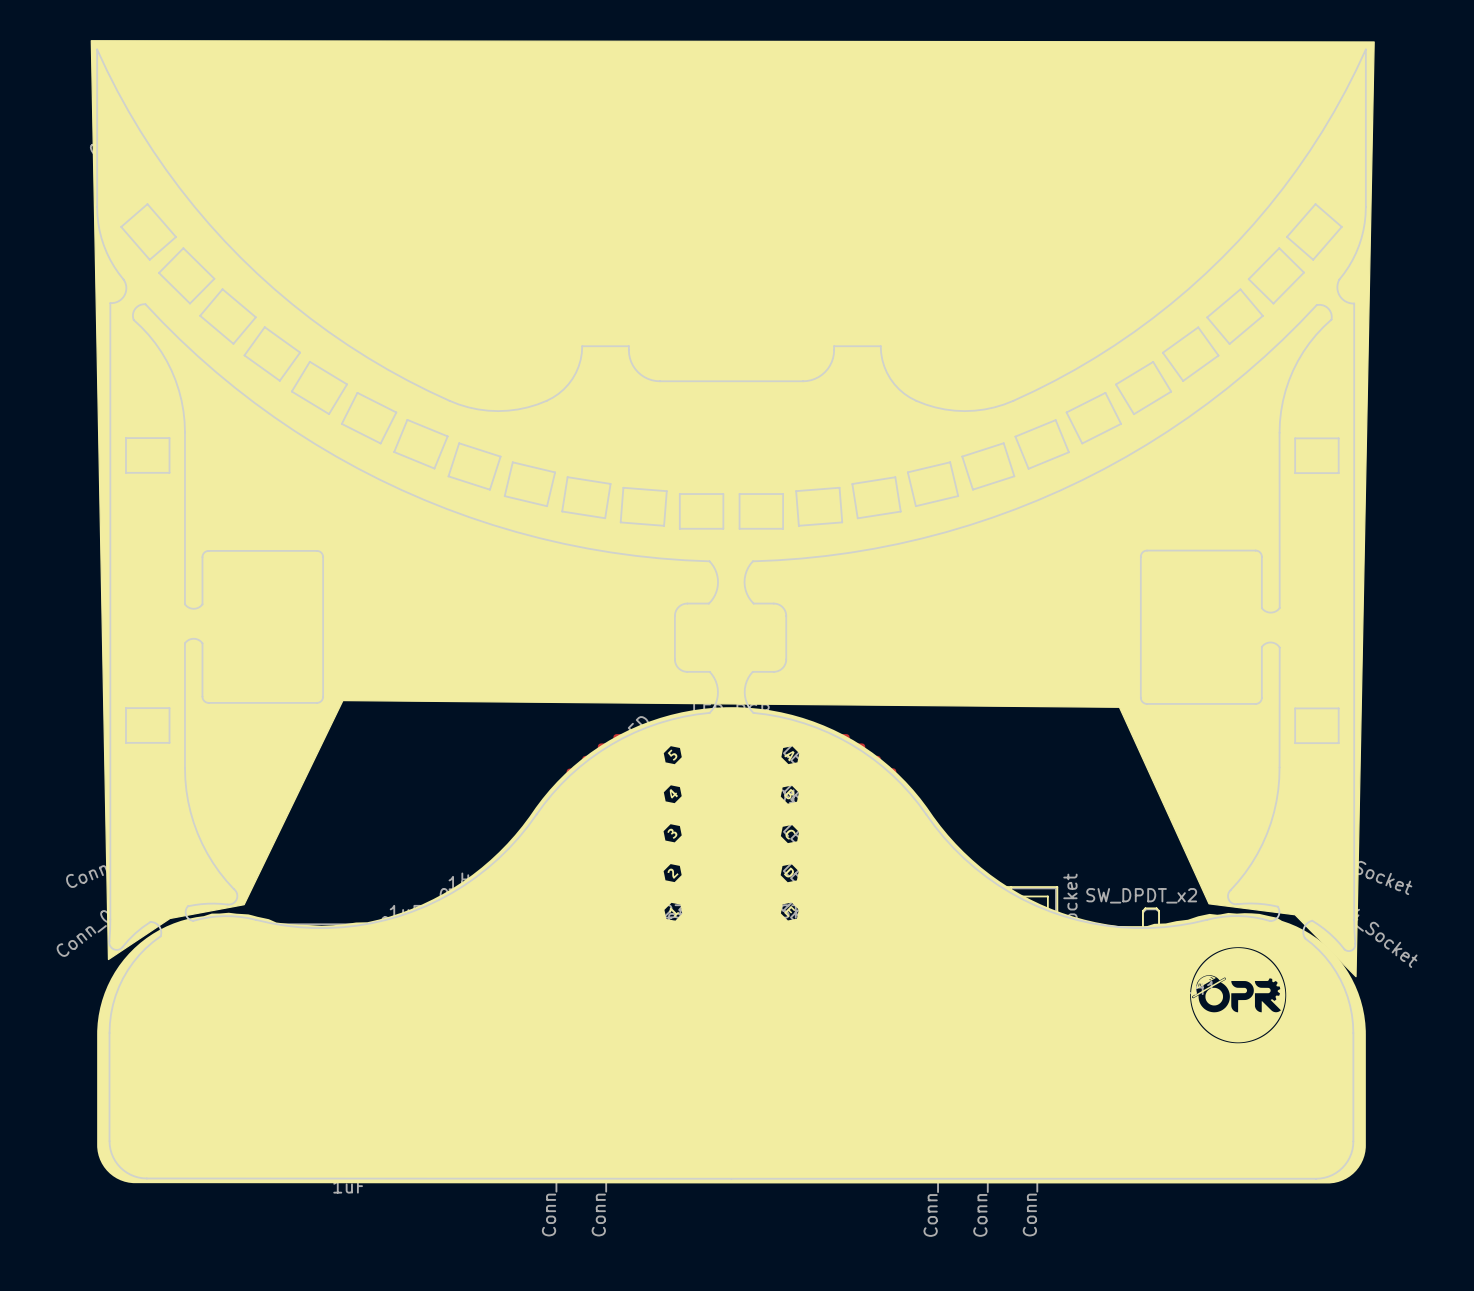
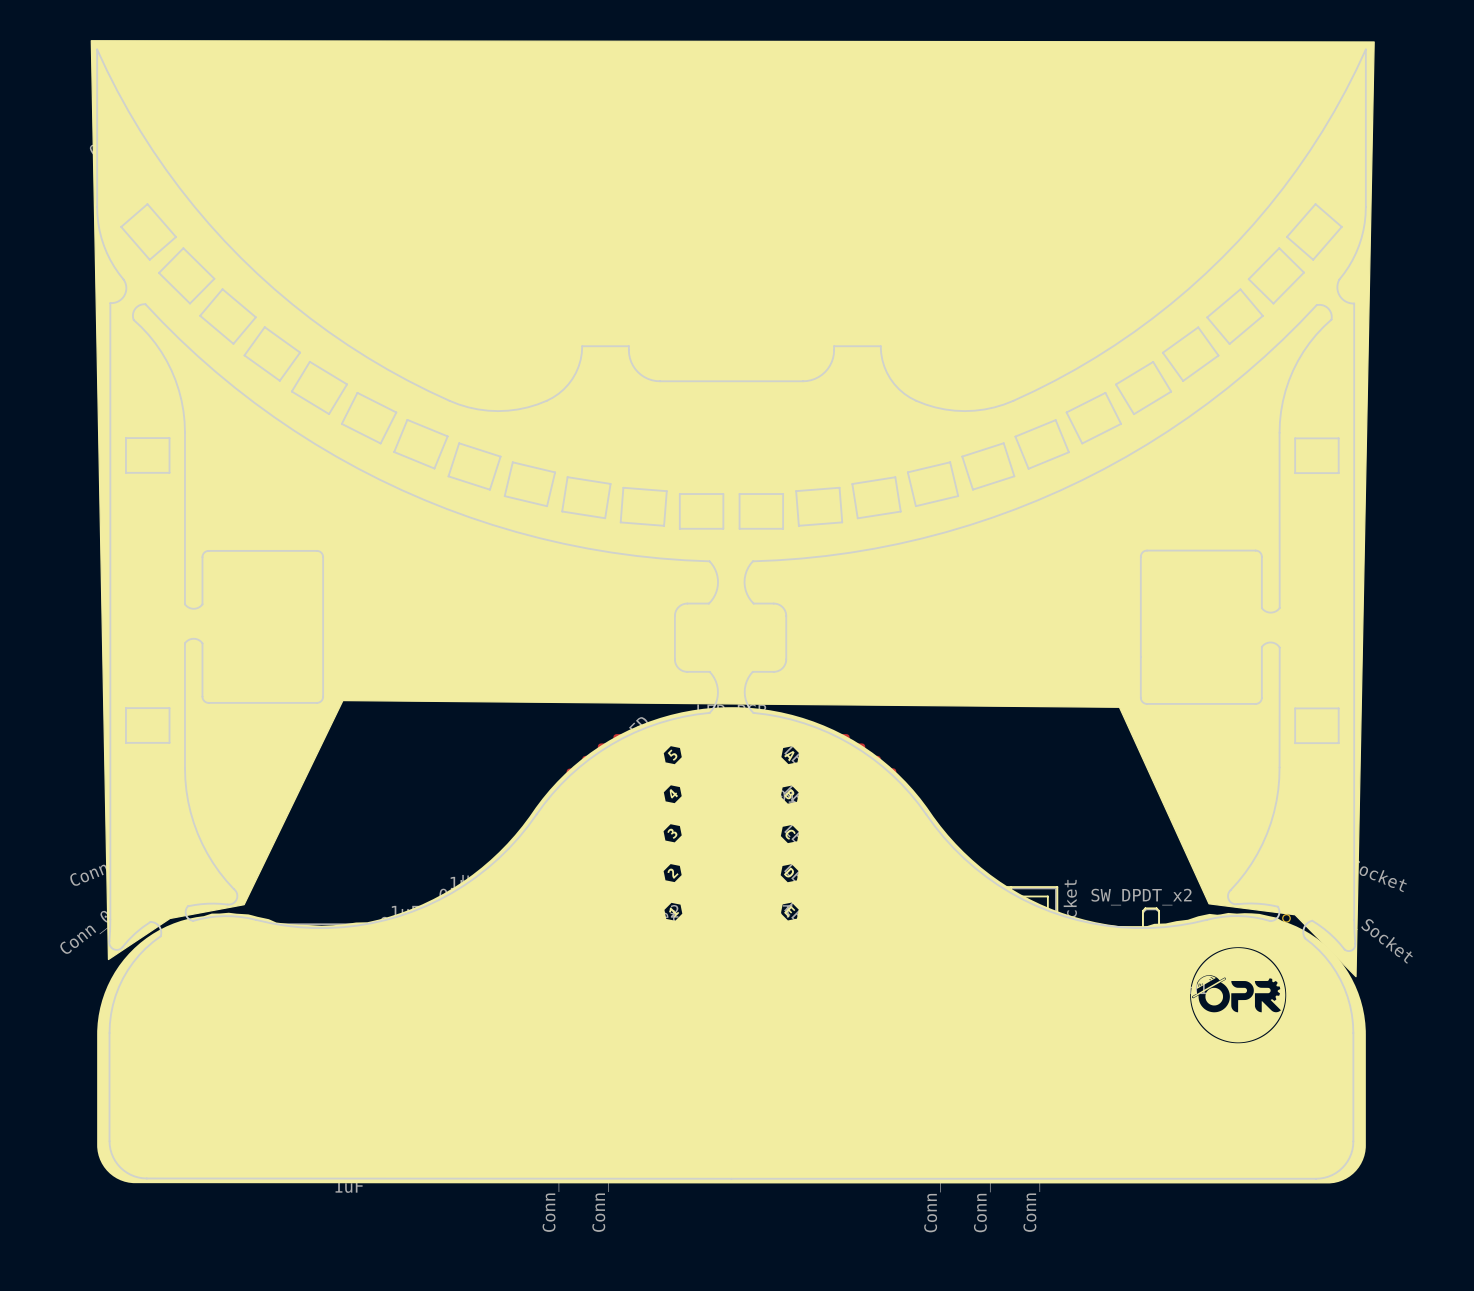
part: none -> (1286, 918)

